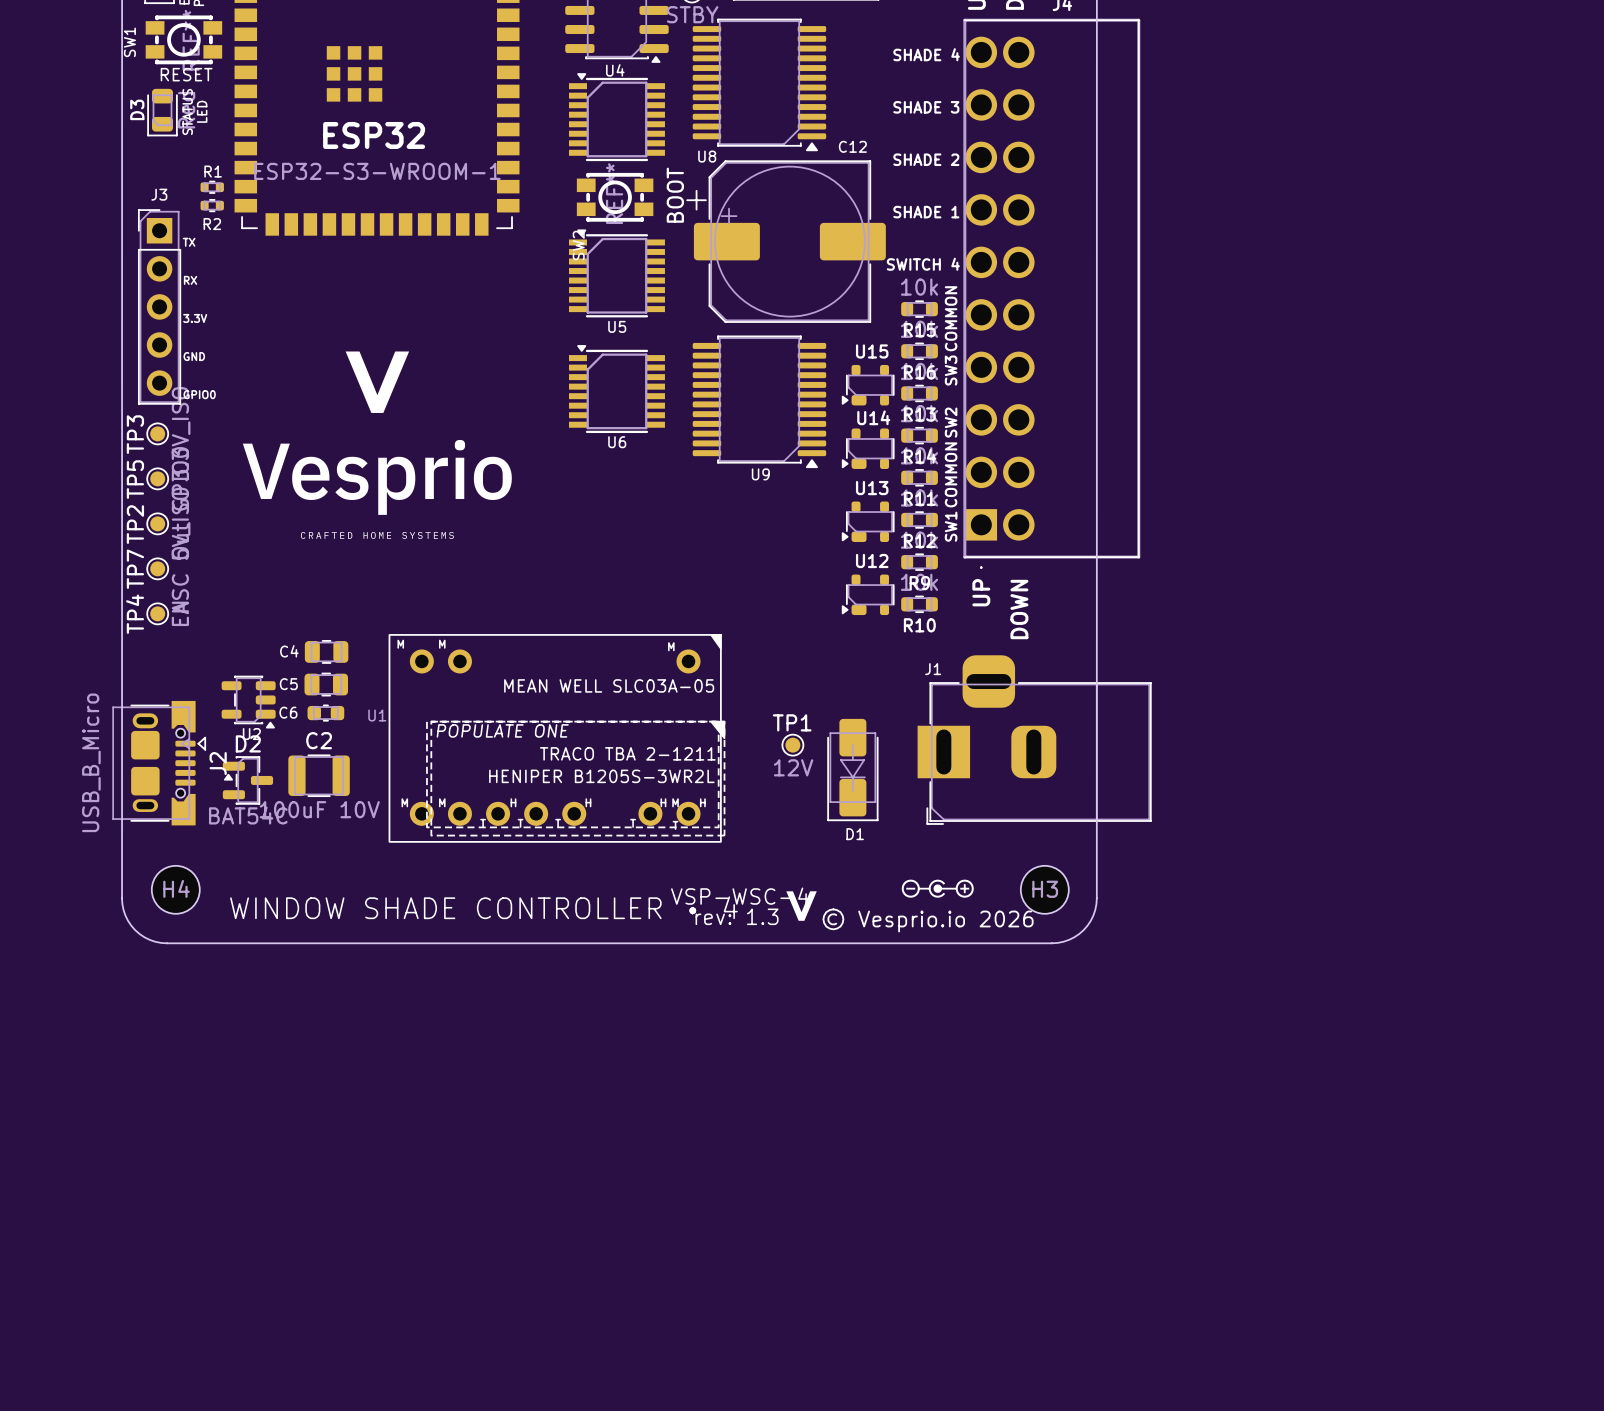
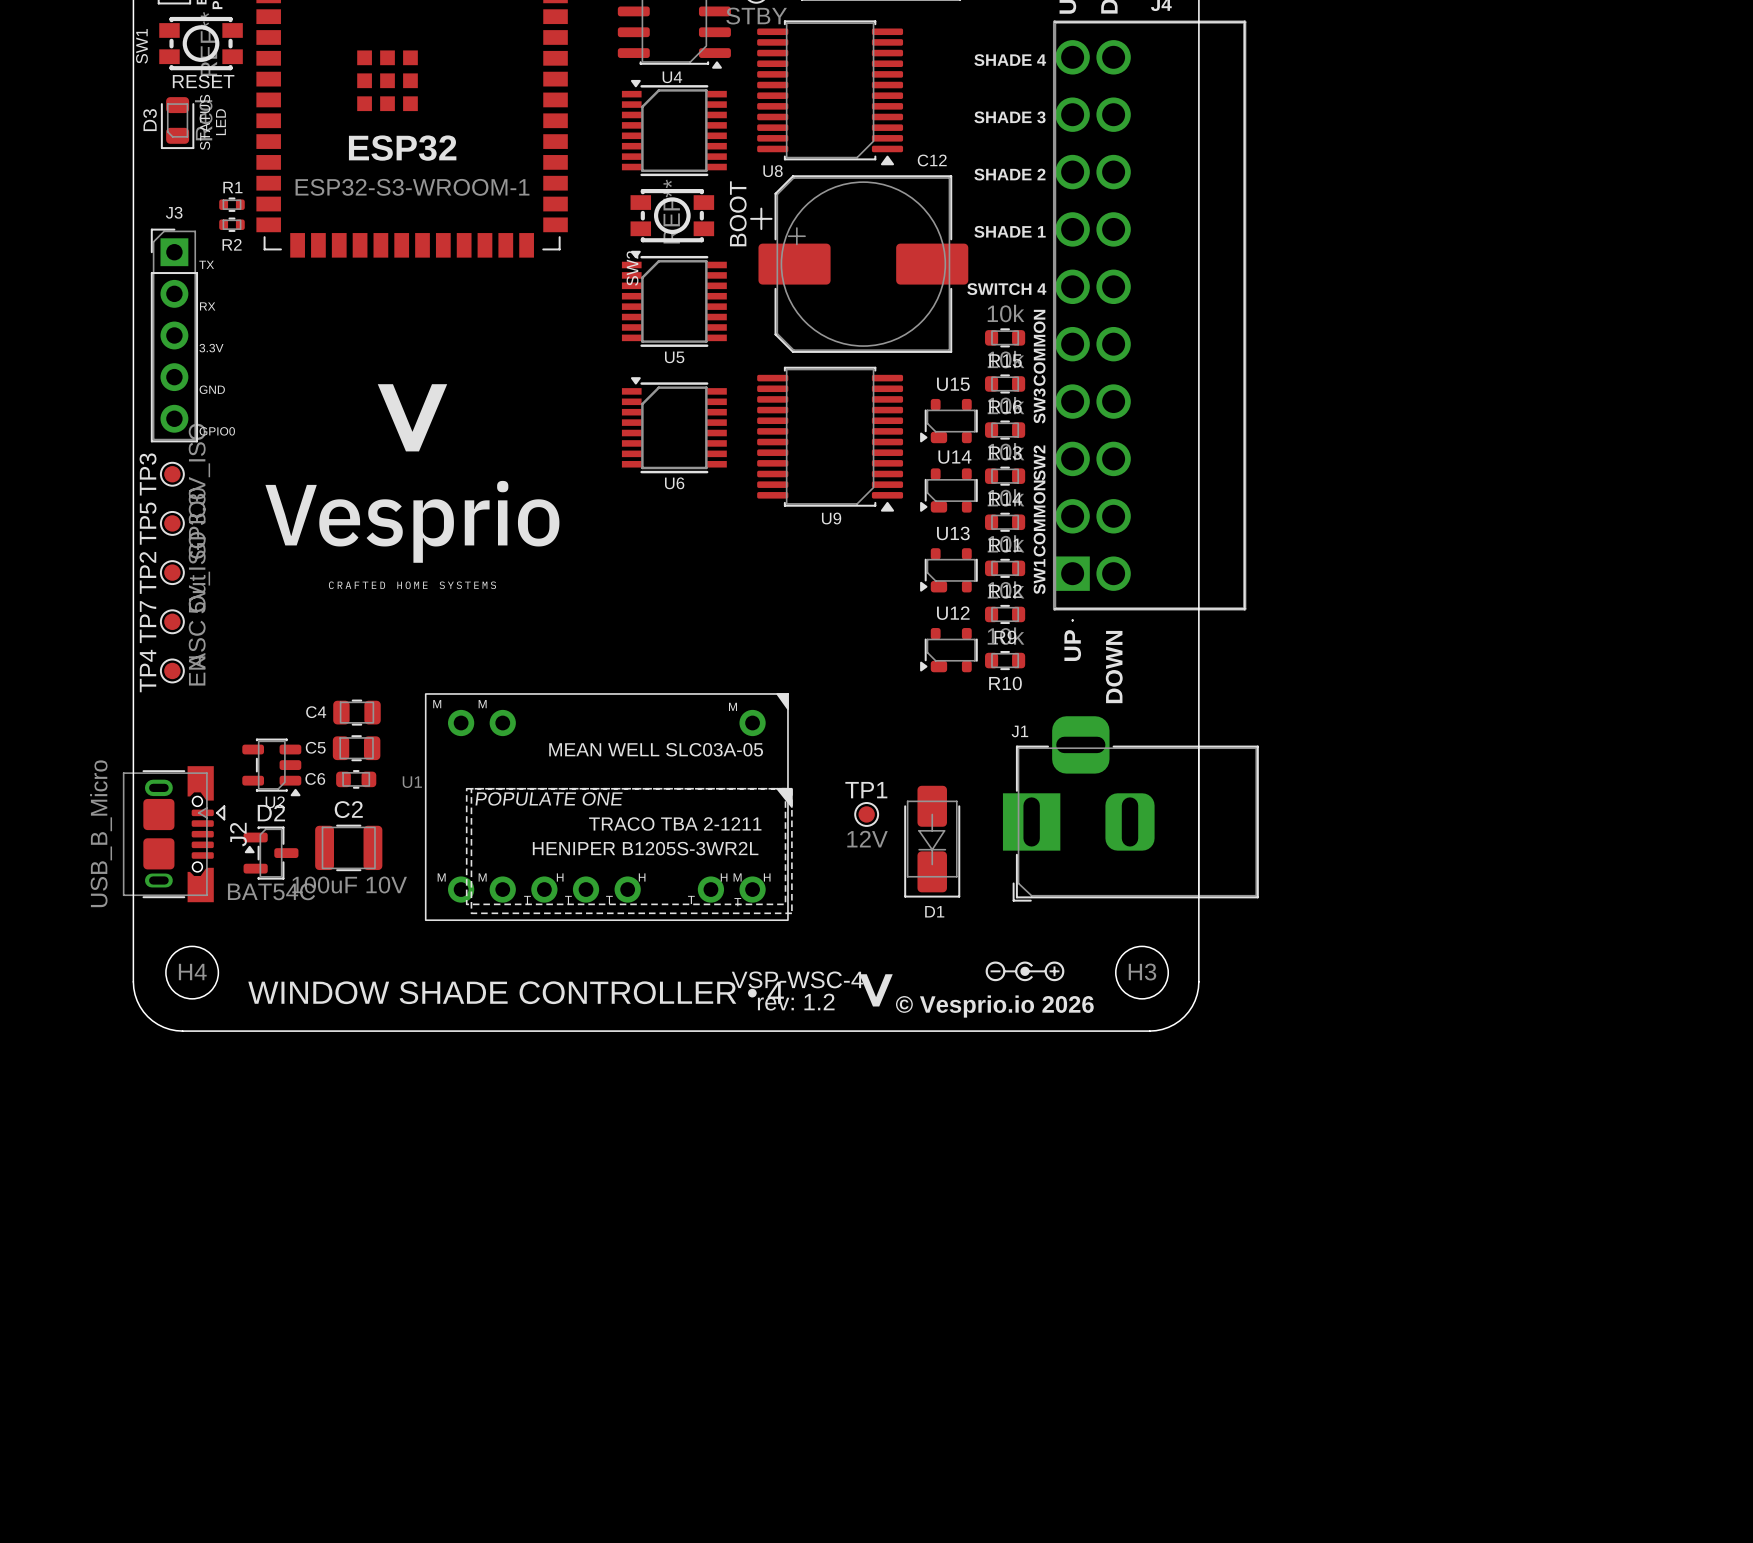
text: rev: 1.3 (737, 916) -> rev: 1.2 (796, 1002)

